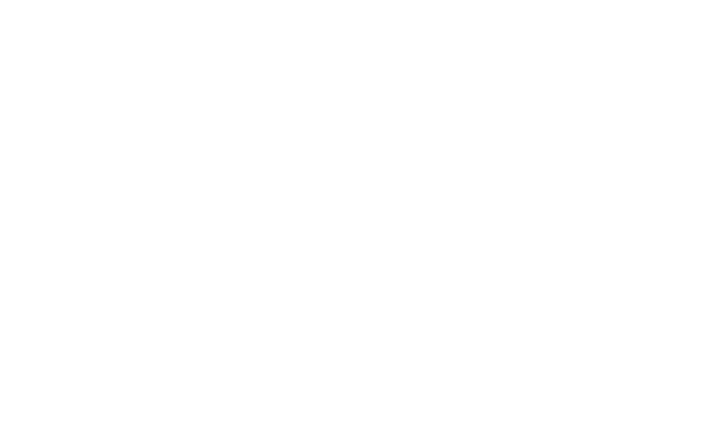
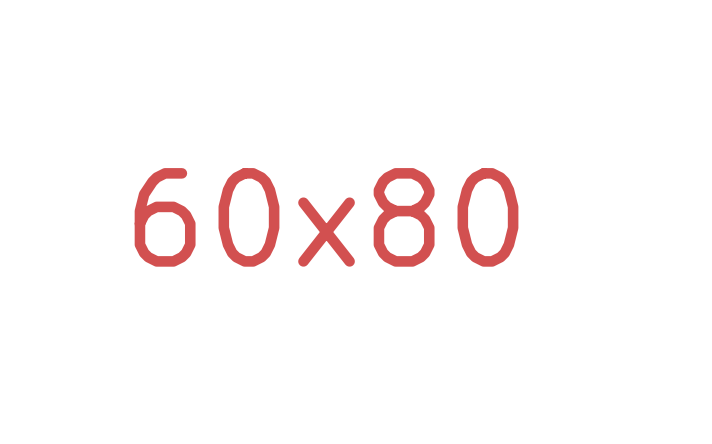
text: none -> 60x80 (326, 217)

